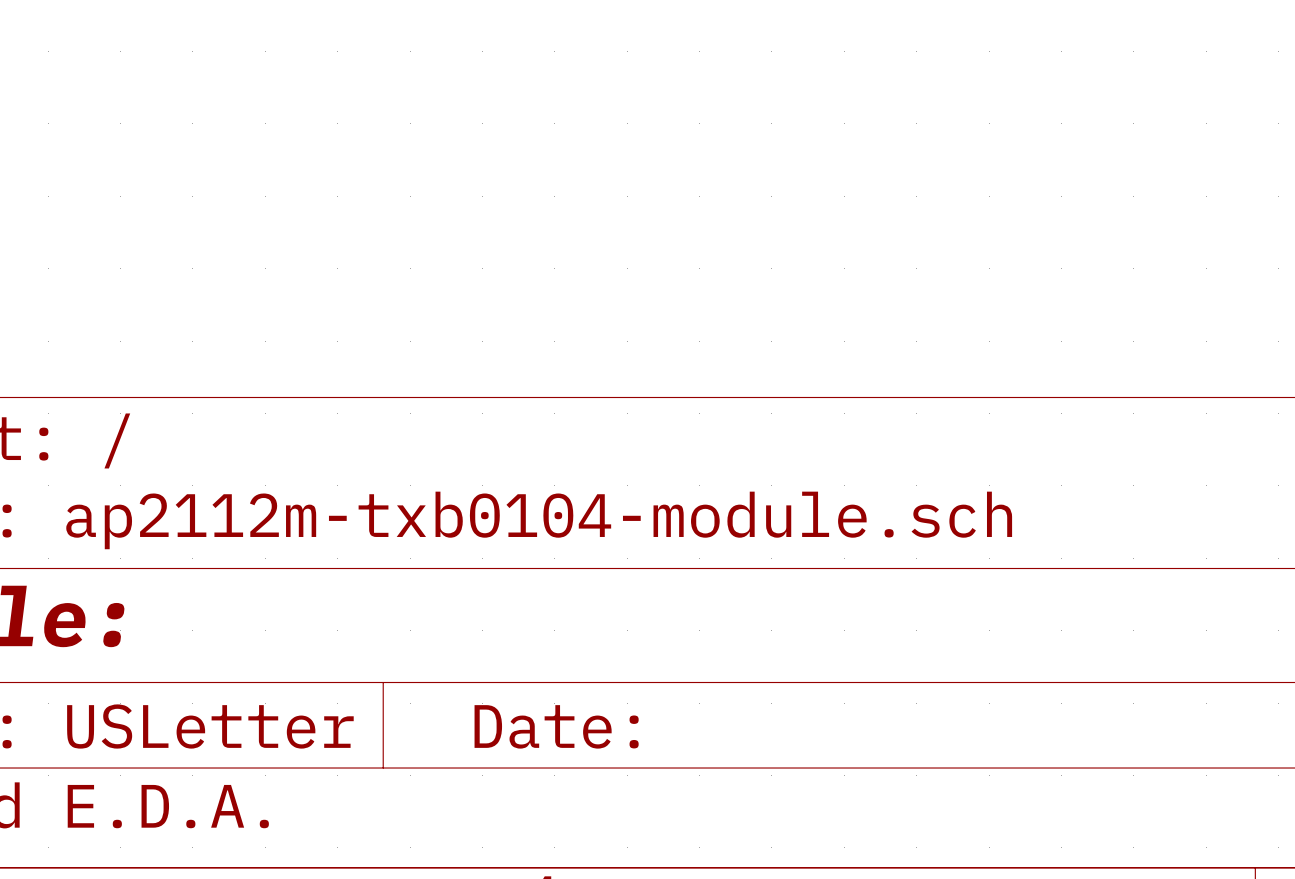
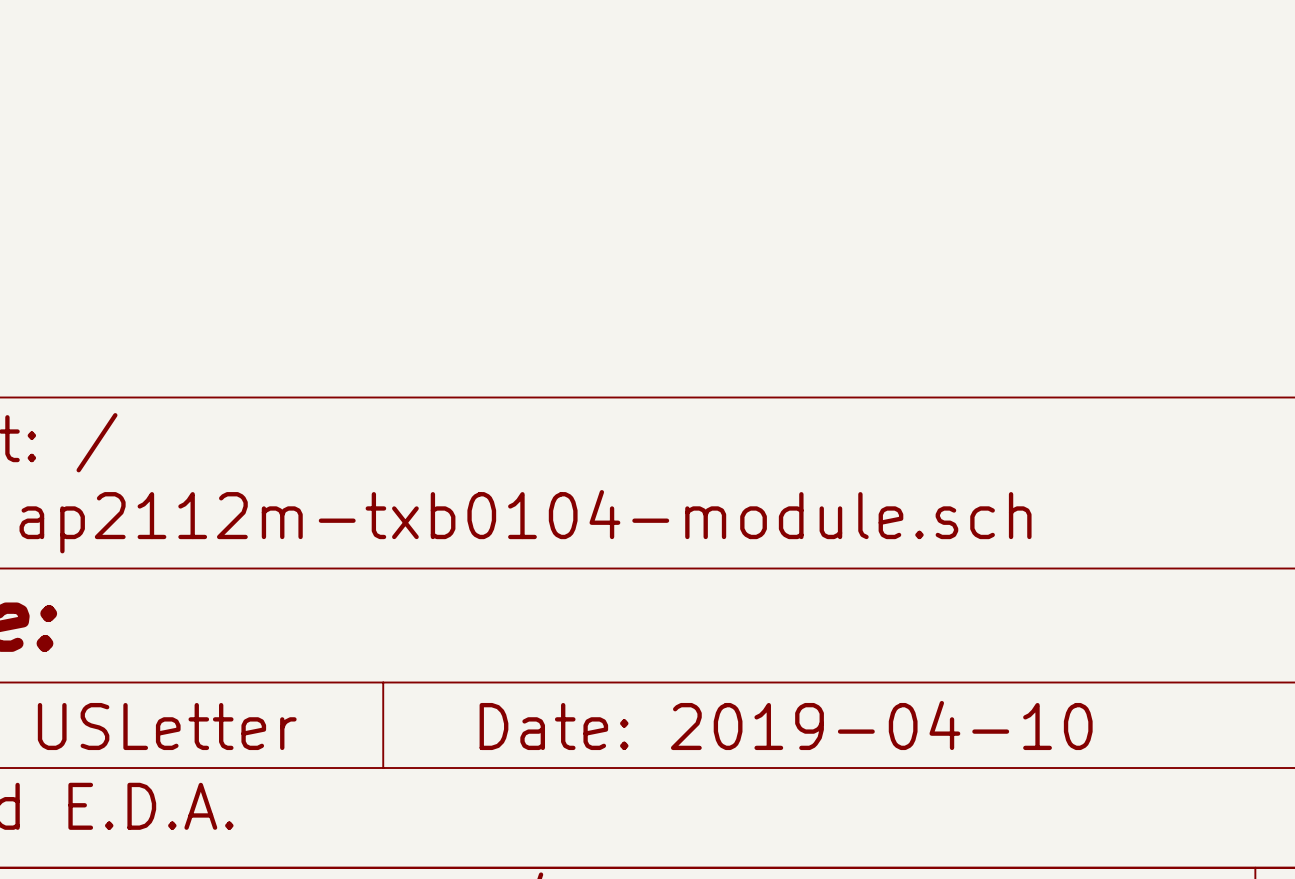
title block: Date: (556, 726) -> Date: 2019-04-10 (786, 725)

